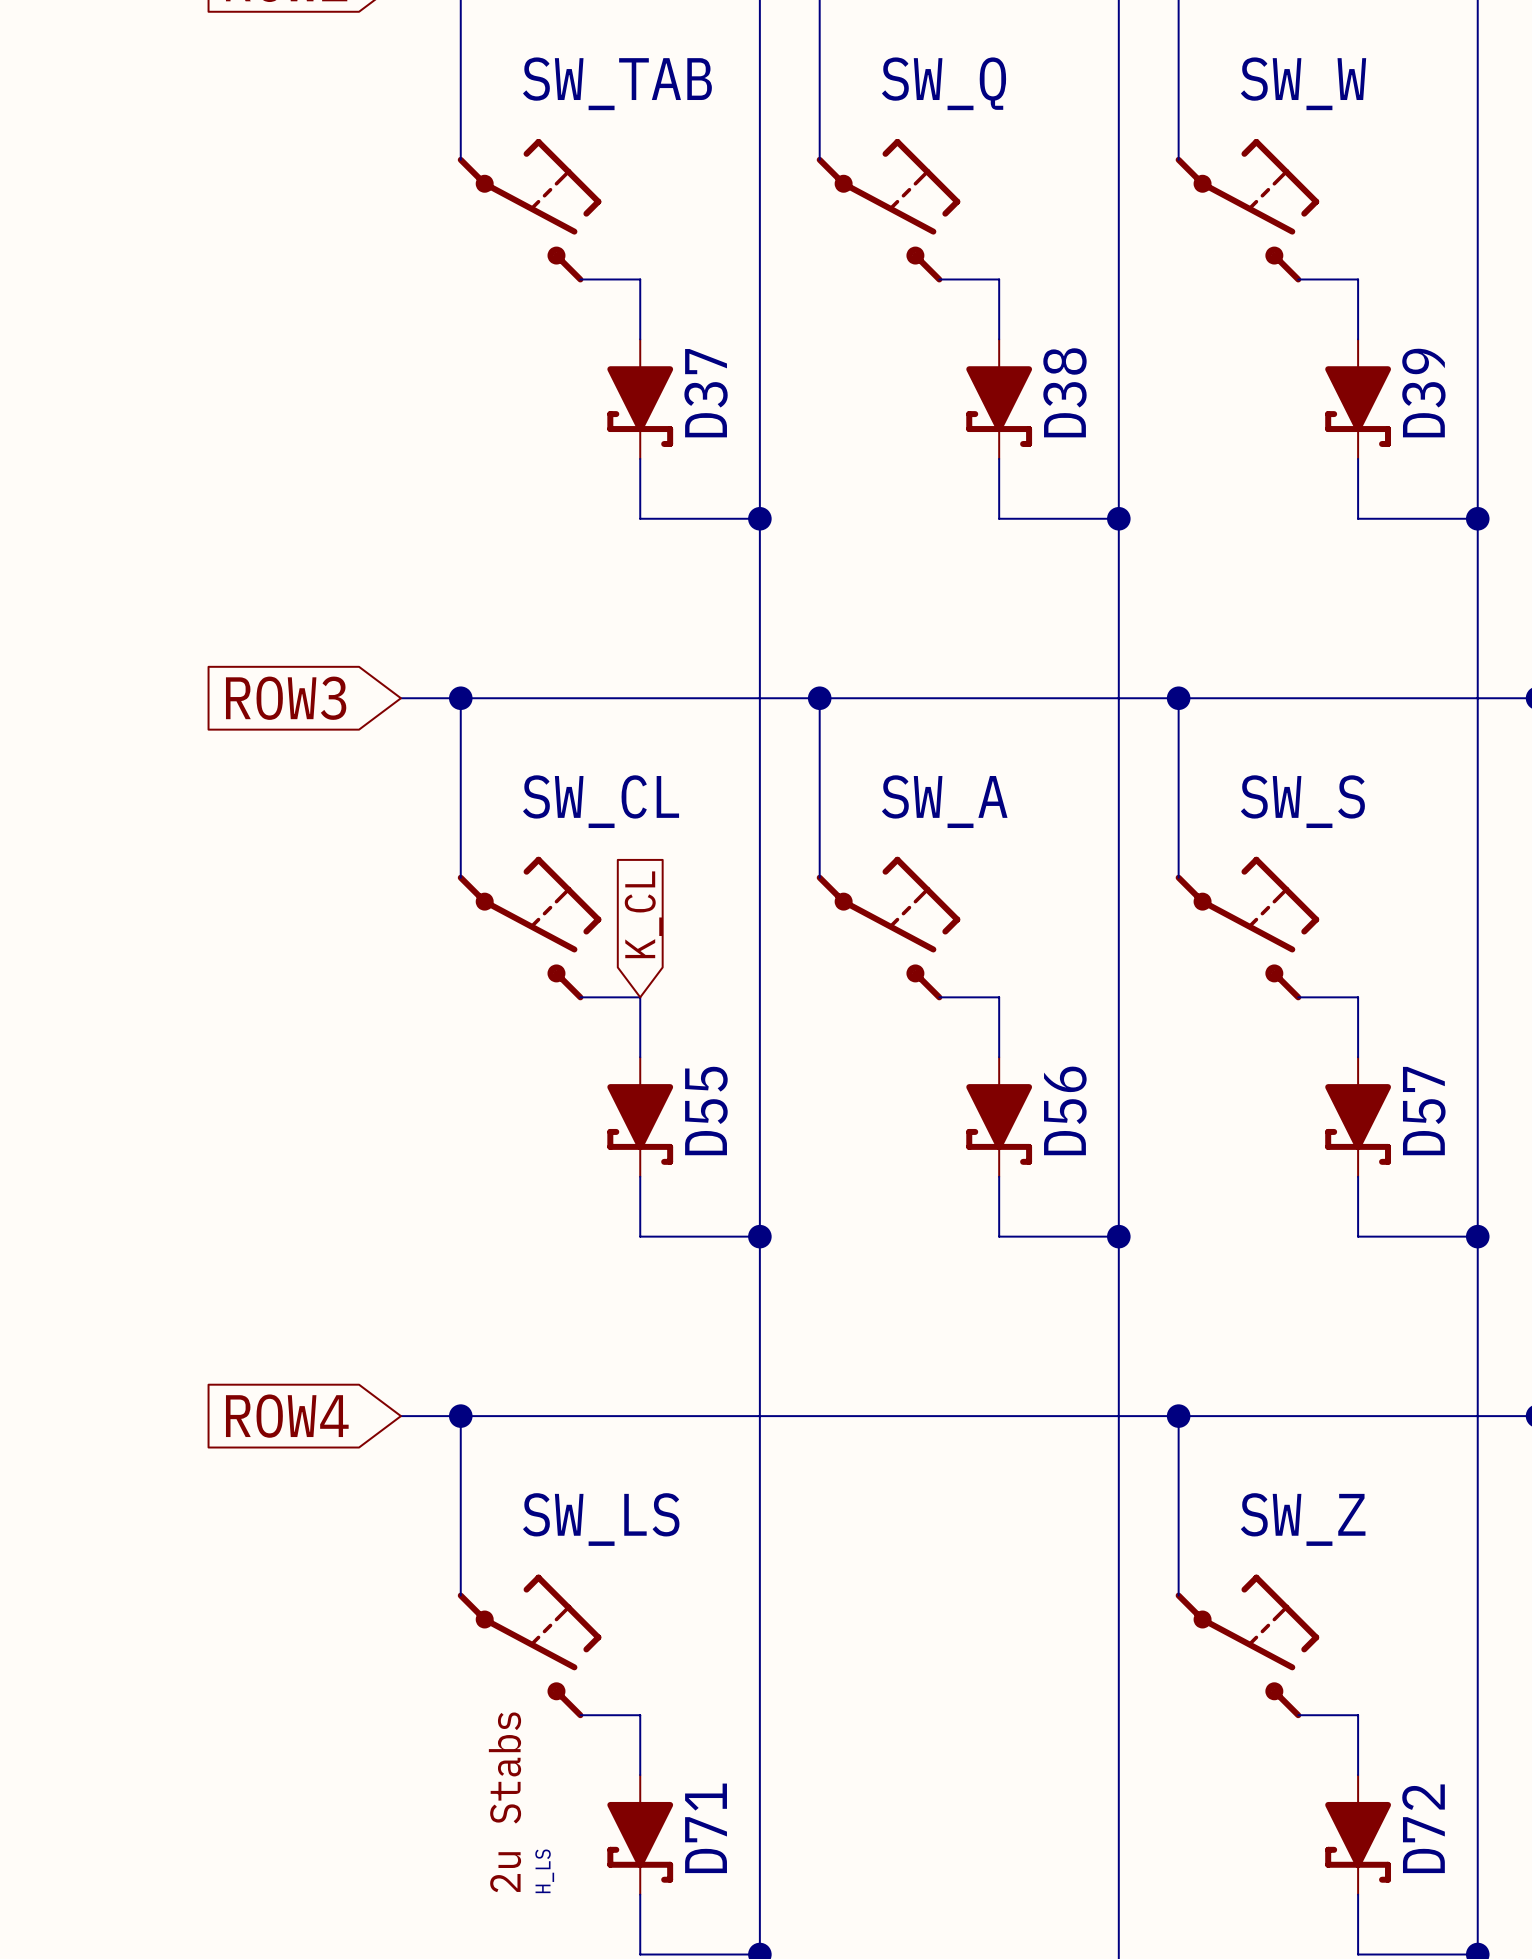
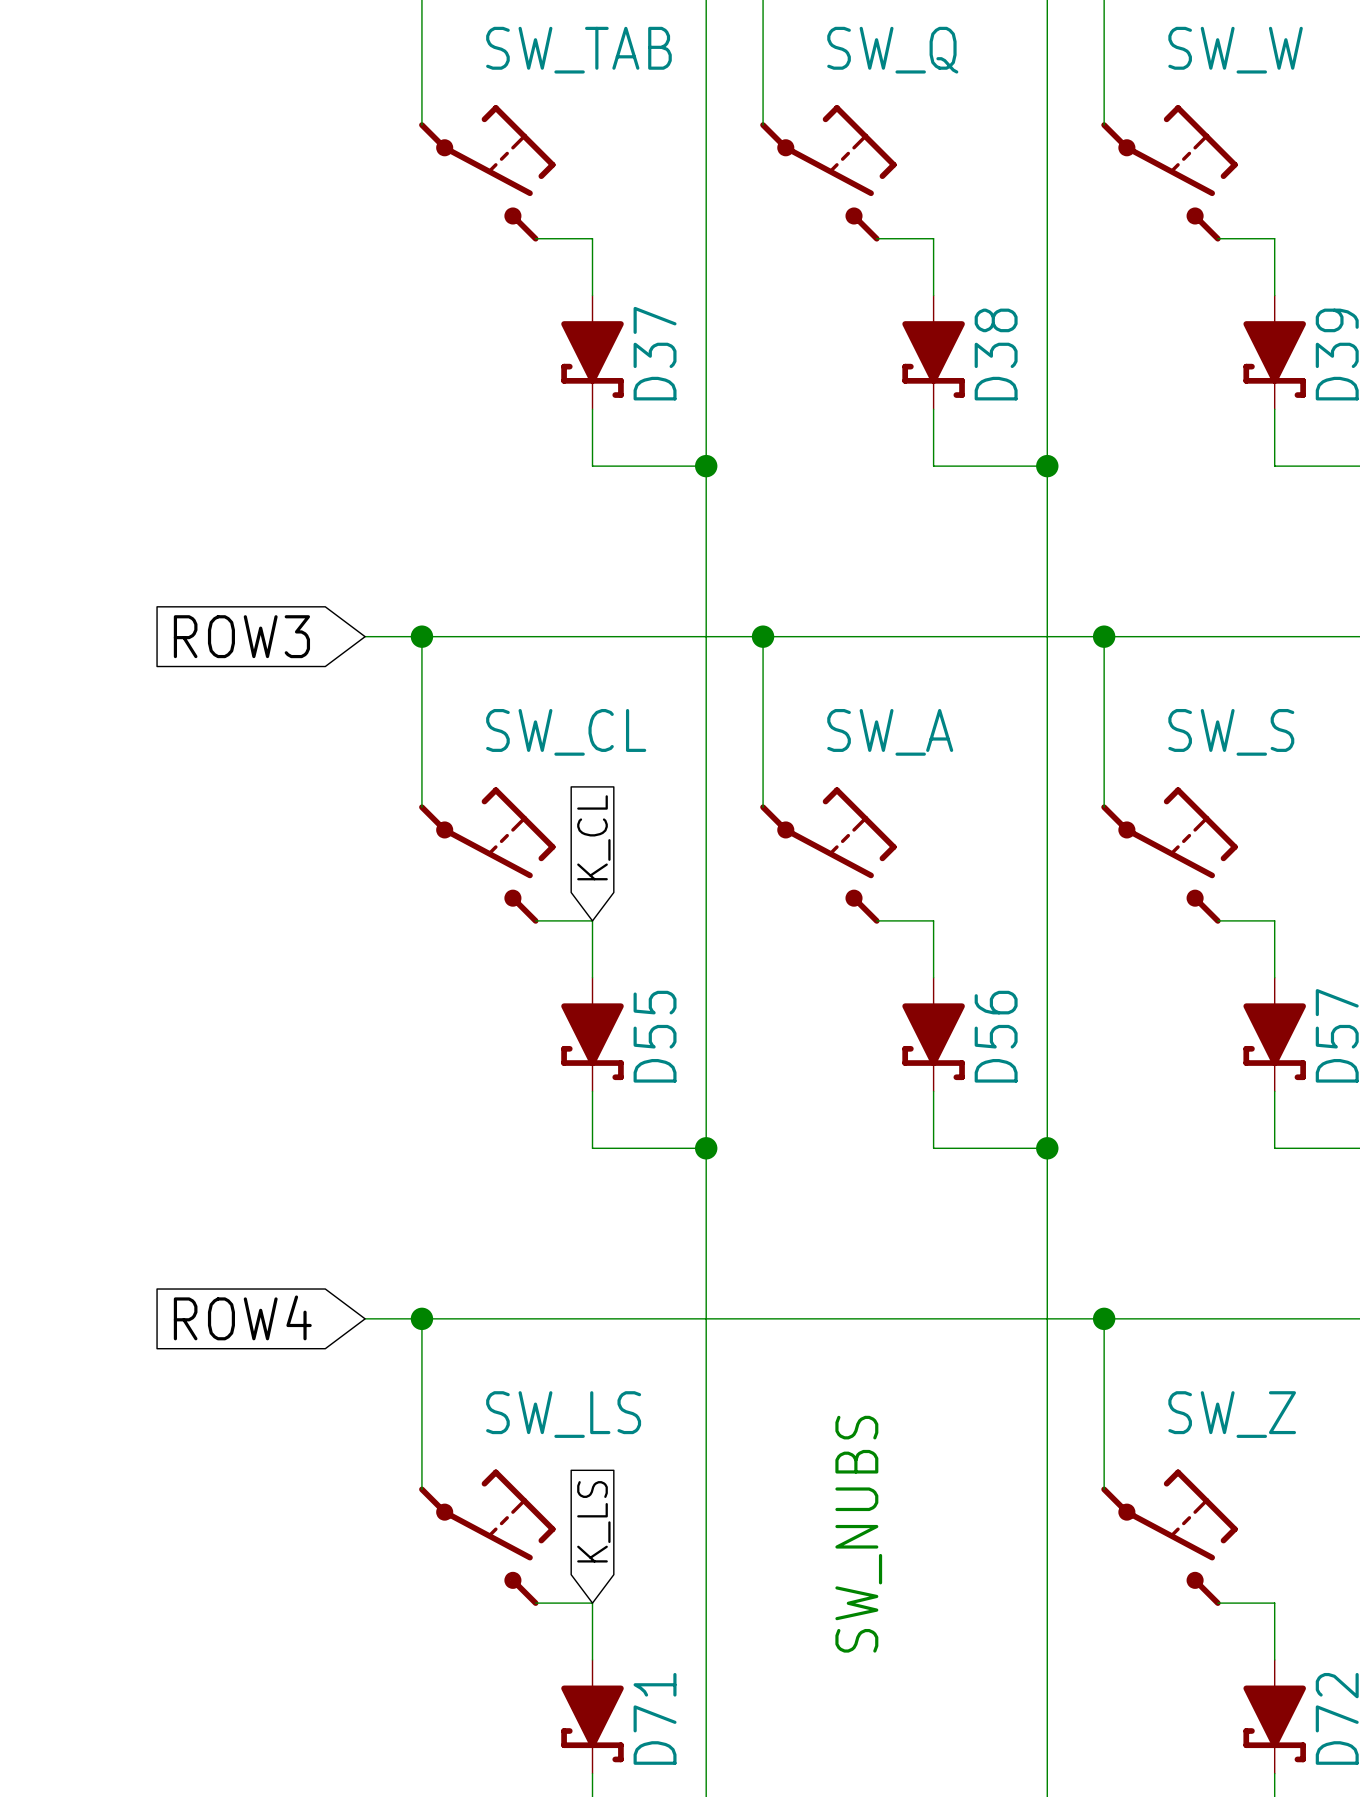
global label: none -> K_LS (593, 1521)
text: none -> SW_NUBS (858, 1534)
H_LS: (521, 1802) -> none

